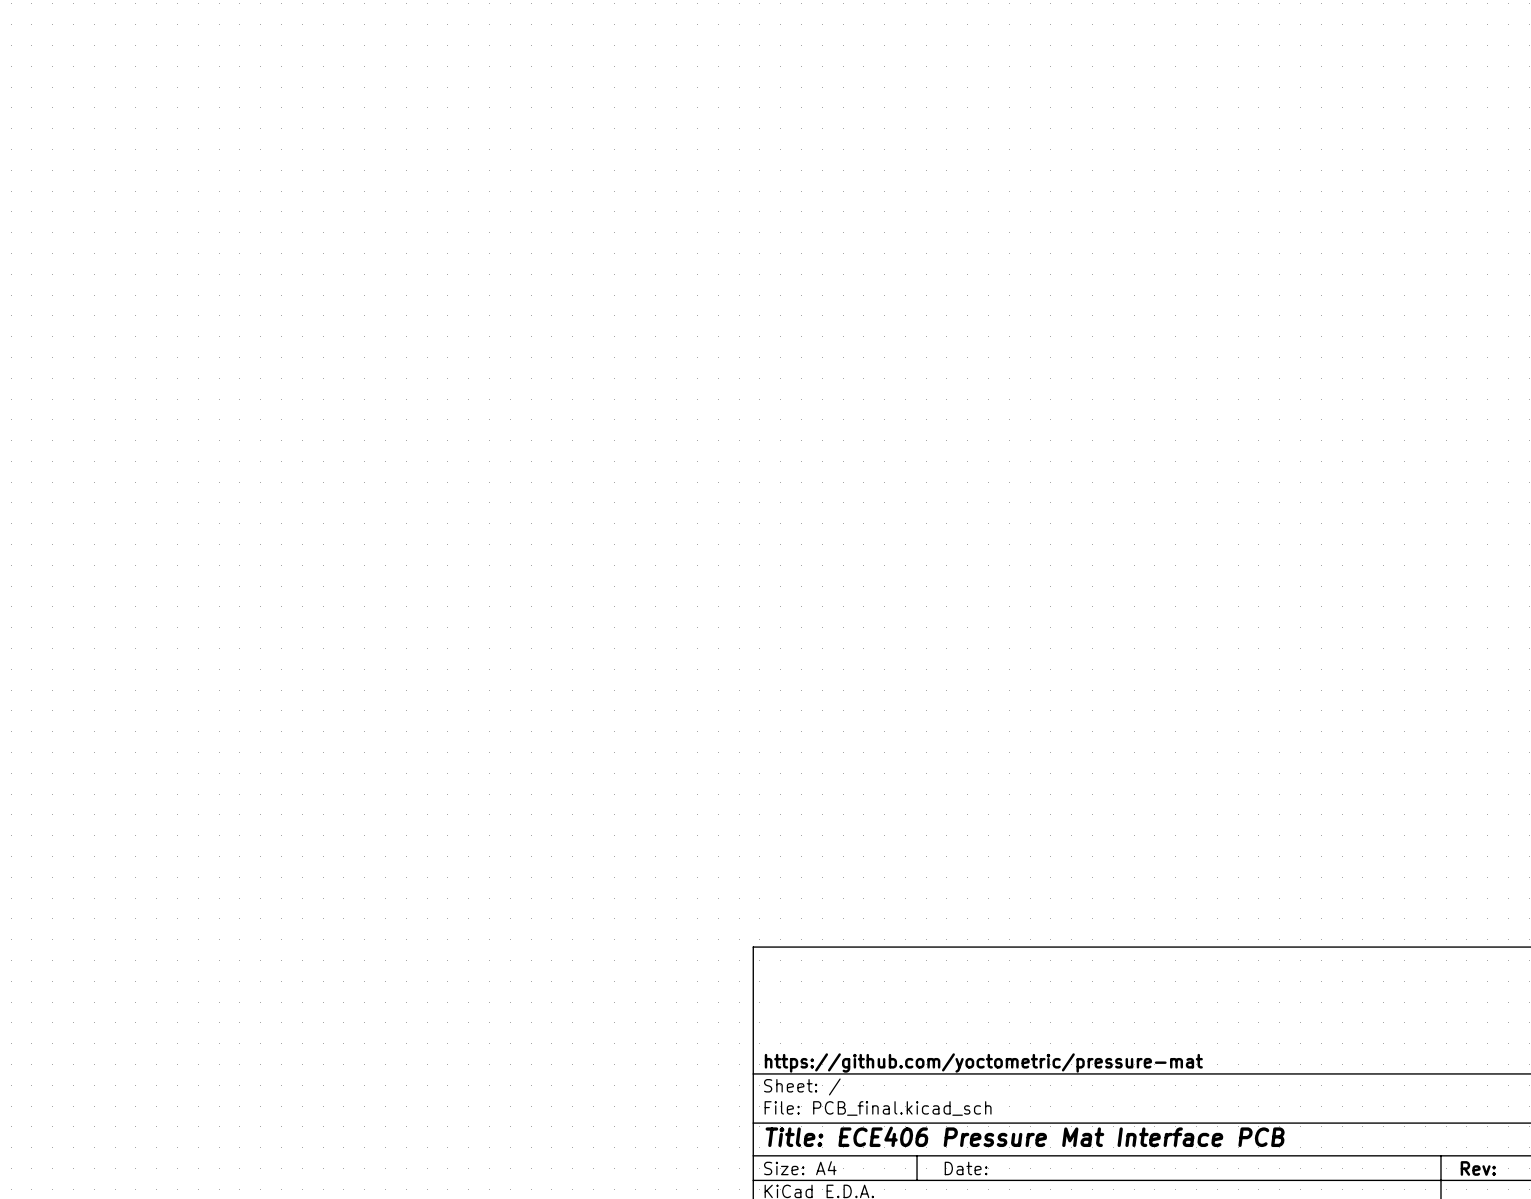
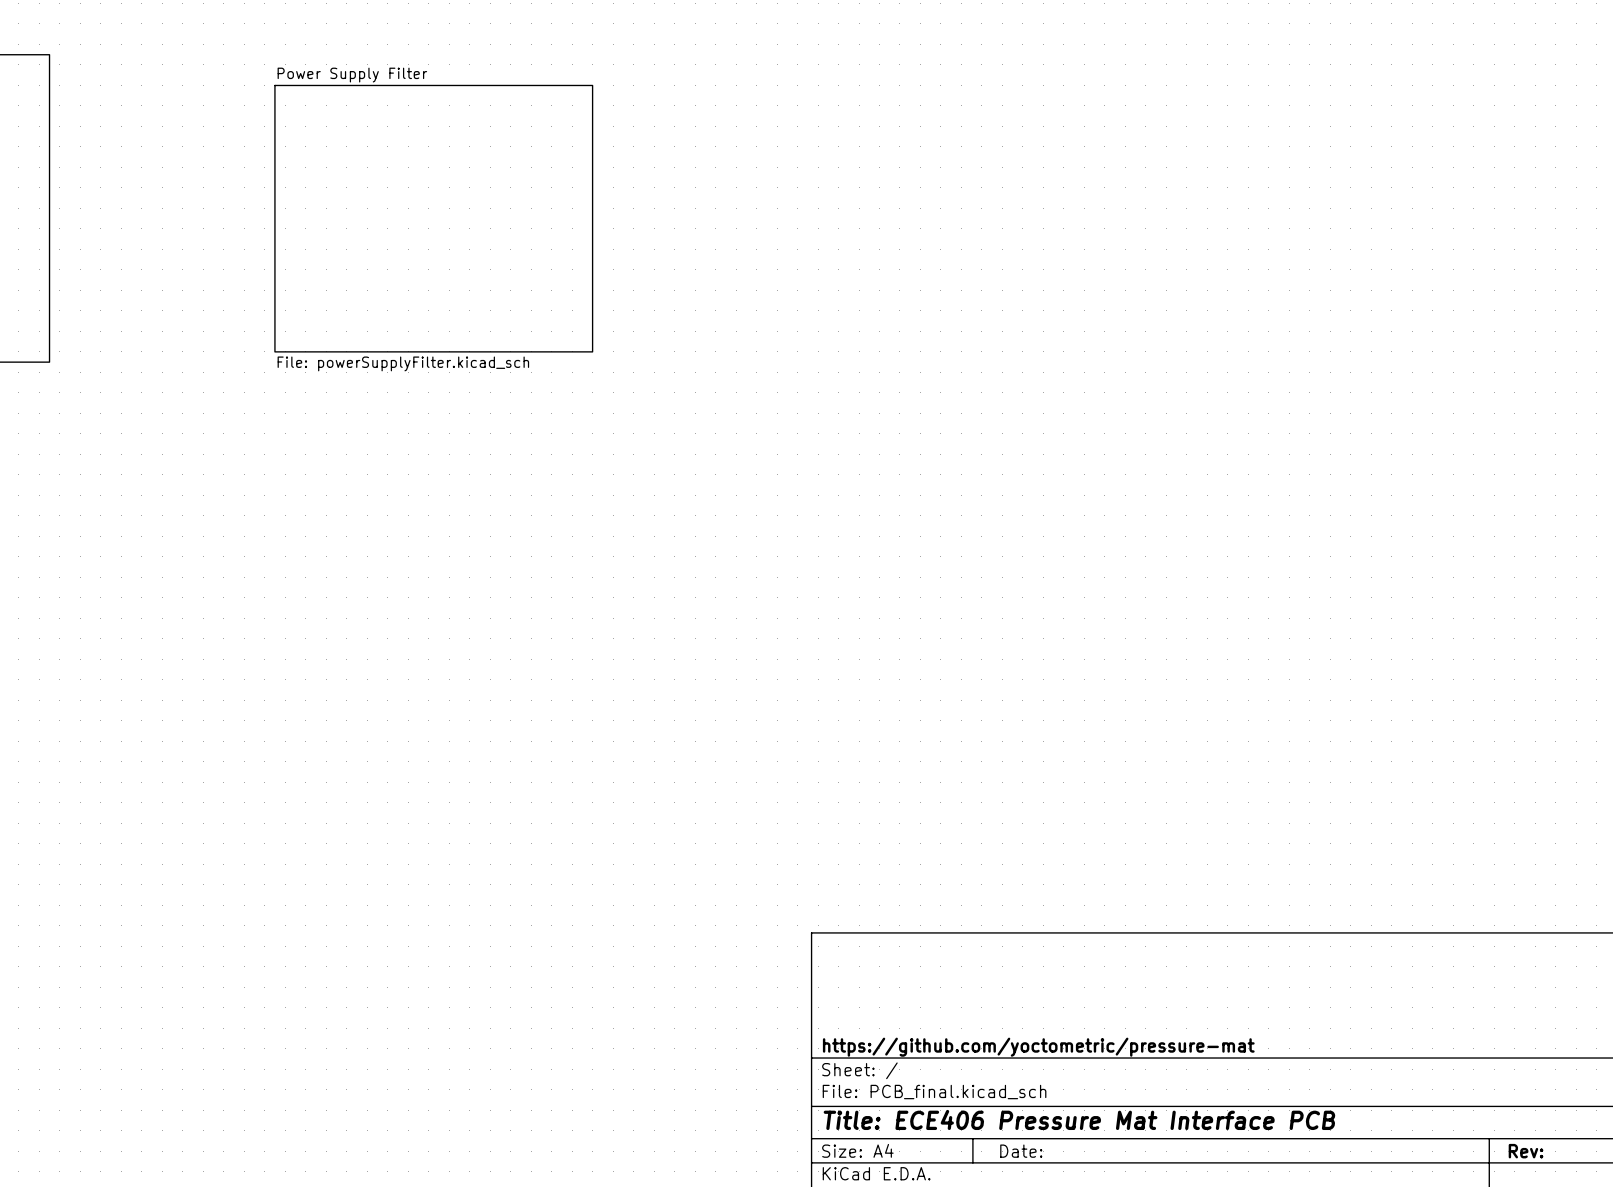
sheet Power Supply Filter: none -> File: powerSupplyFilter.kicad_sch (433, 218)

